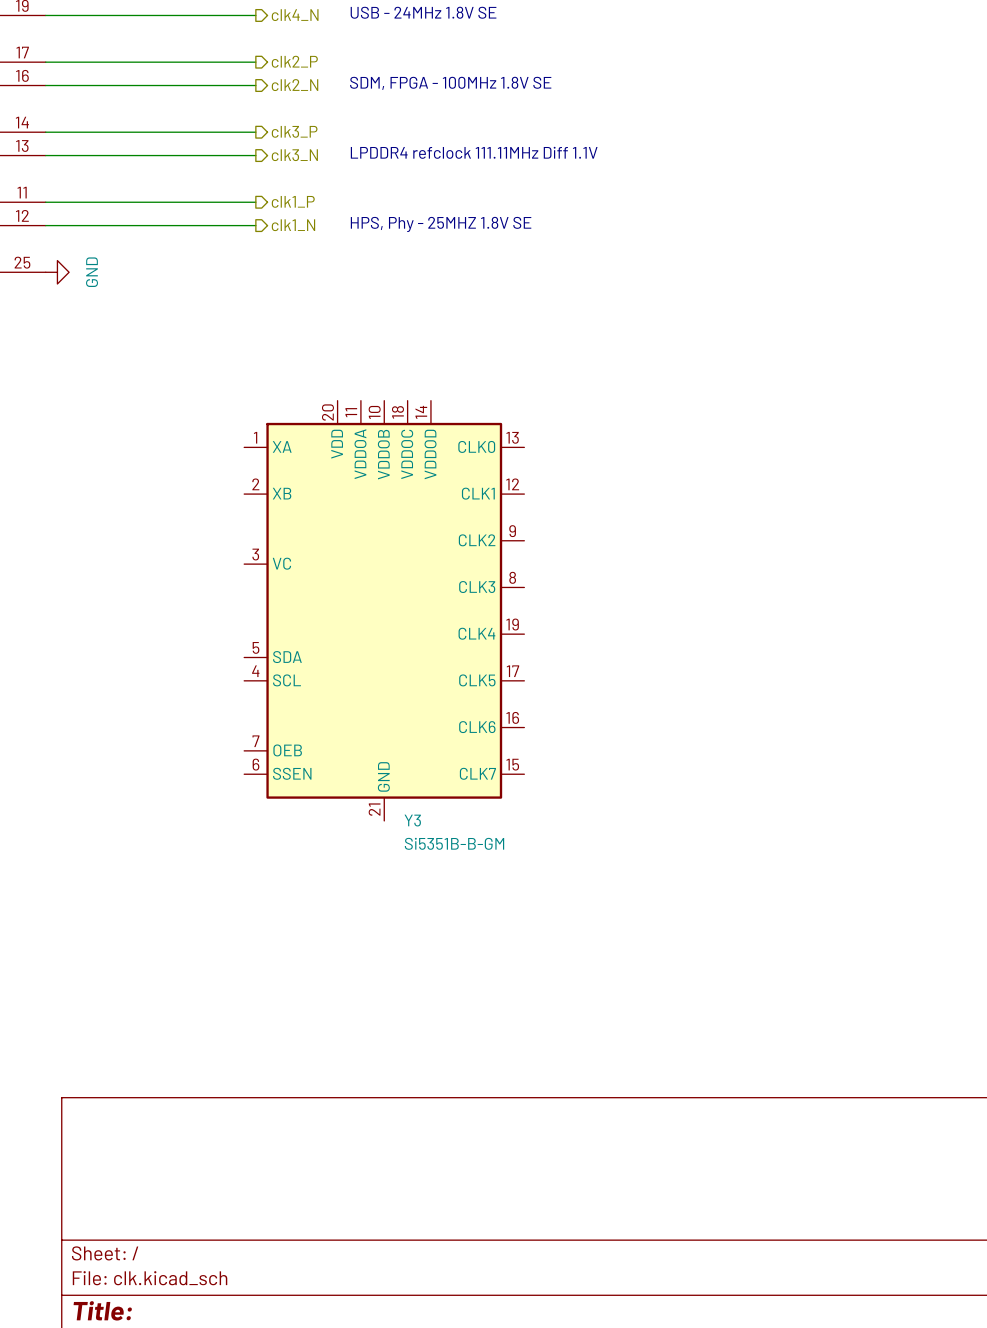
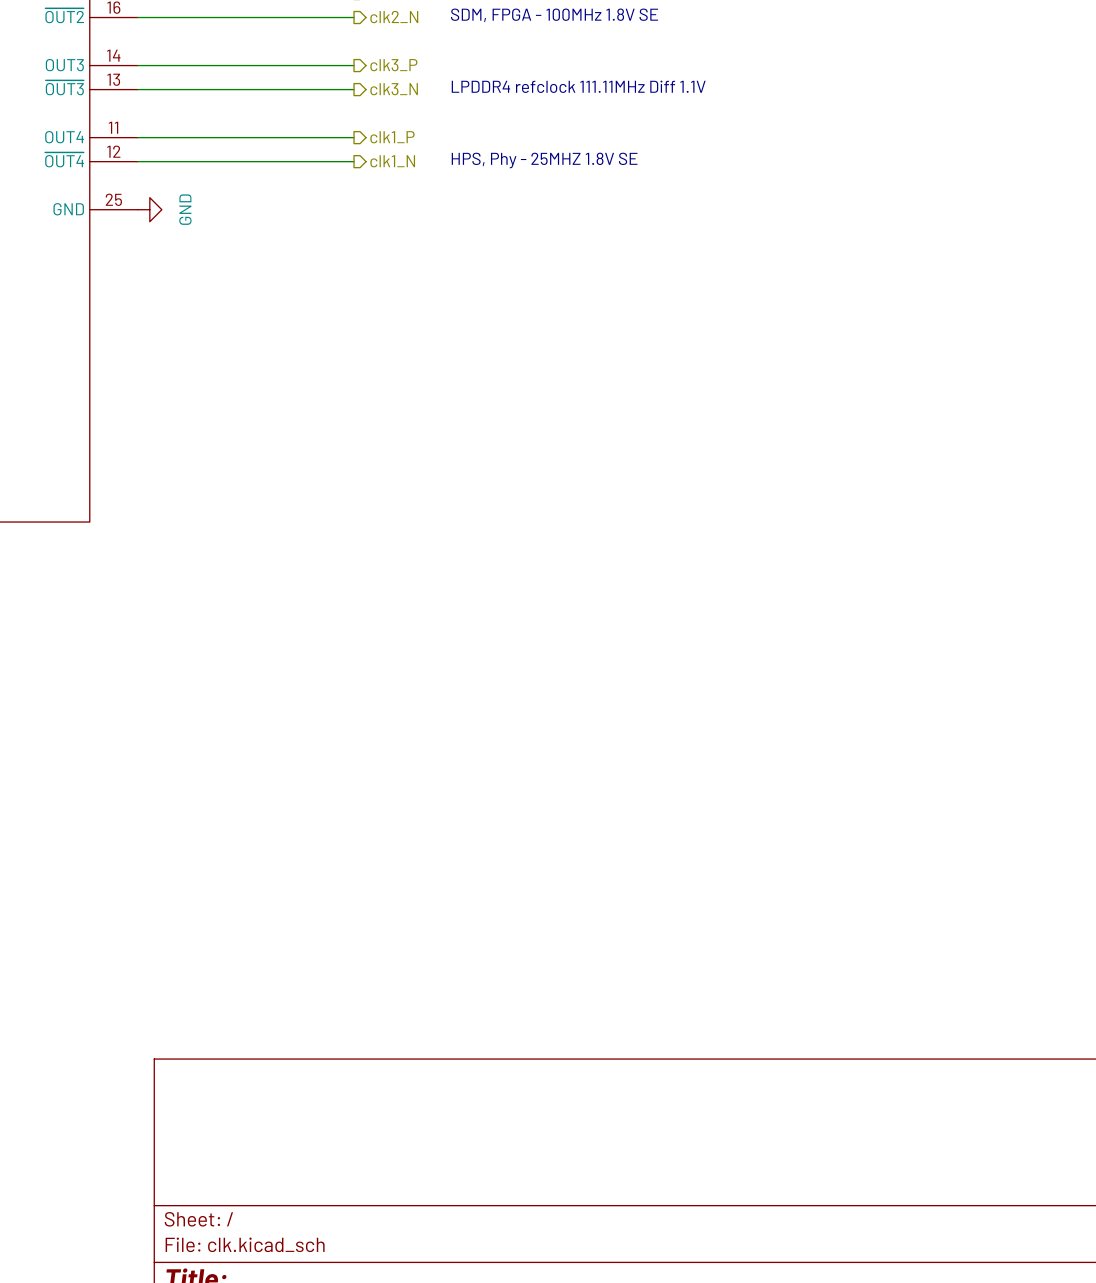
Y3: Si5351B-B-GM (384, 610) -> none

